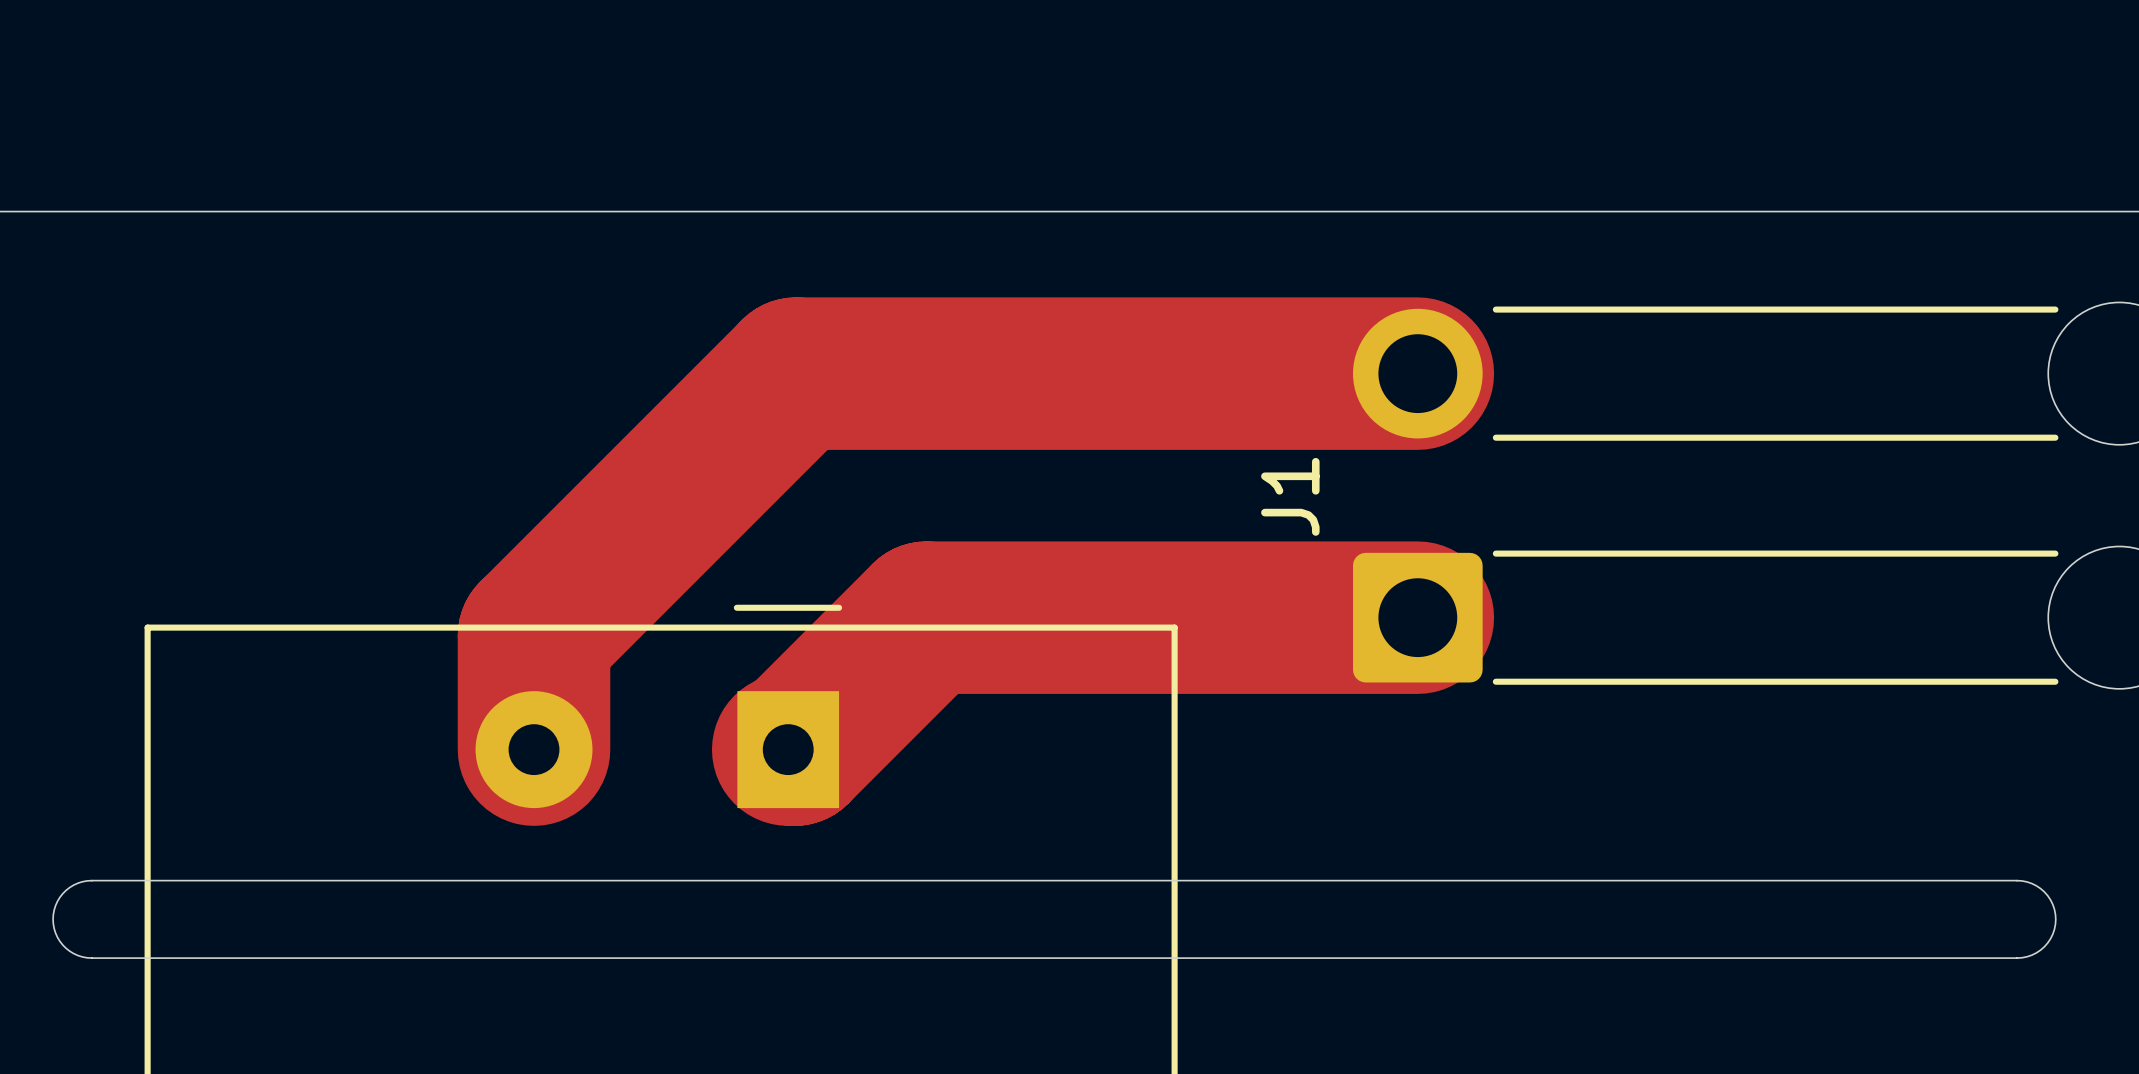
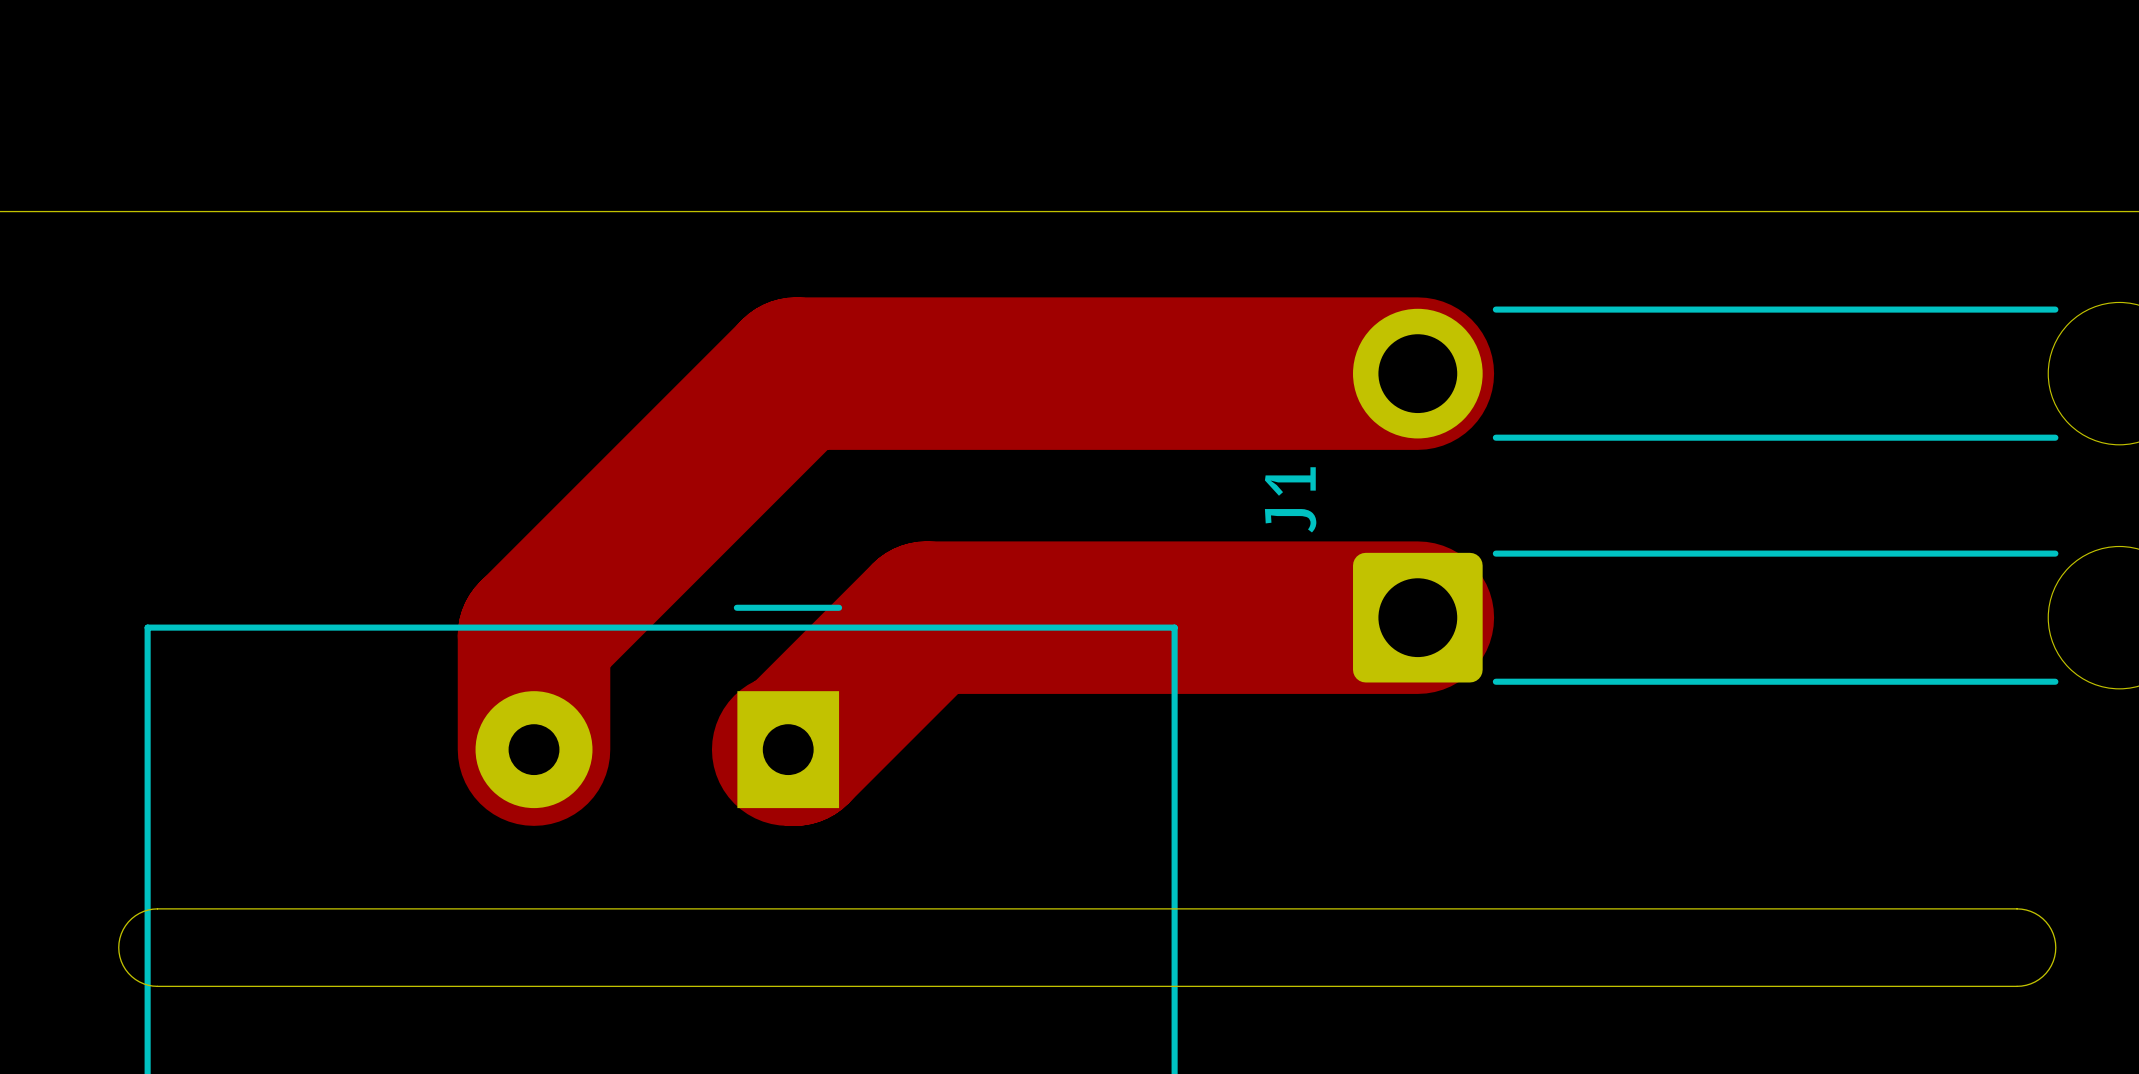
board edge: (91, 880) (2017, 880) (2031, 883) (2044, 891) (2052, 904) (2055, 919) (2052, 934) (2044, 946) (2031, 955) (2017, 958) (91, 958) (78, 955) (66, 948) (55, 933) (53, 919) (55, 905) (62, 893) (73, 885) (91, 880) -> none
board edge: none -> (157, 908) (2017, 908) (2030, 911) (2042, 918) (2053, 933) (2055, 947) (2053, 961) (2042, 976) (2030, 983) (2017, 986) (157, 986) (139, 981) (128, 973) (121, 961) (118, 947) (121, 933) (131, 918) (143, 911) (157, 908)

